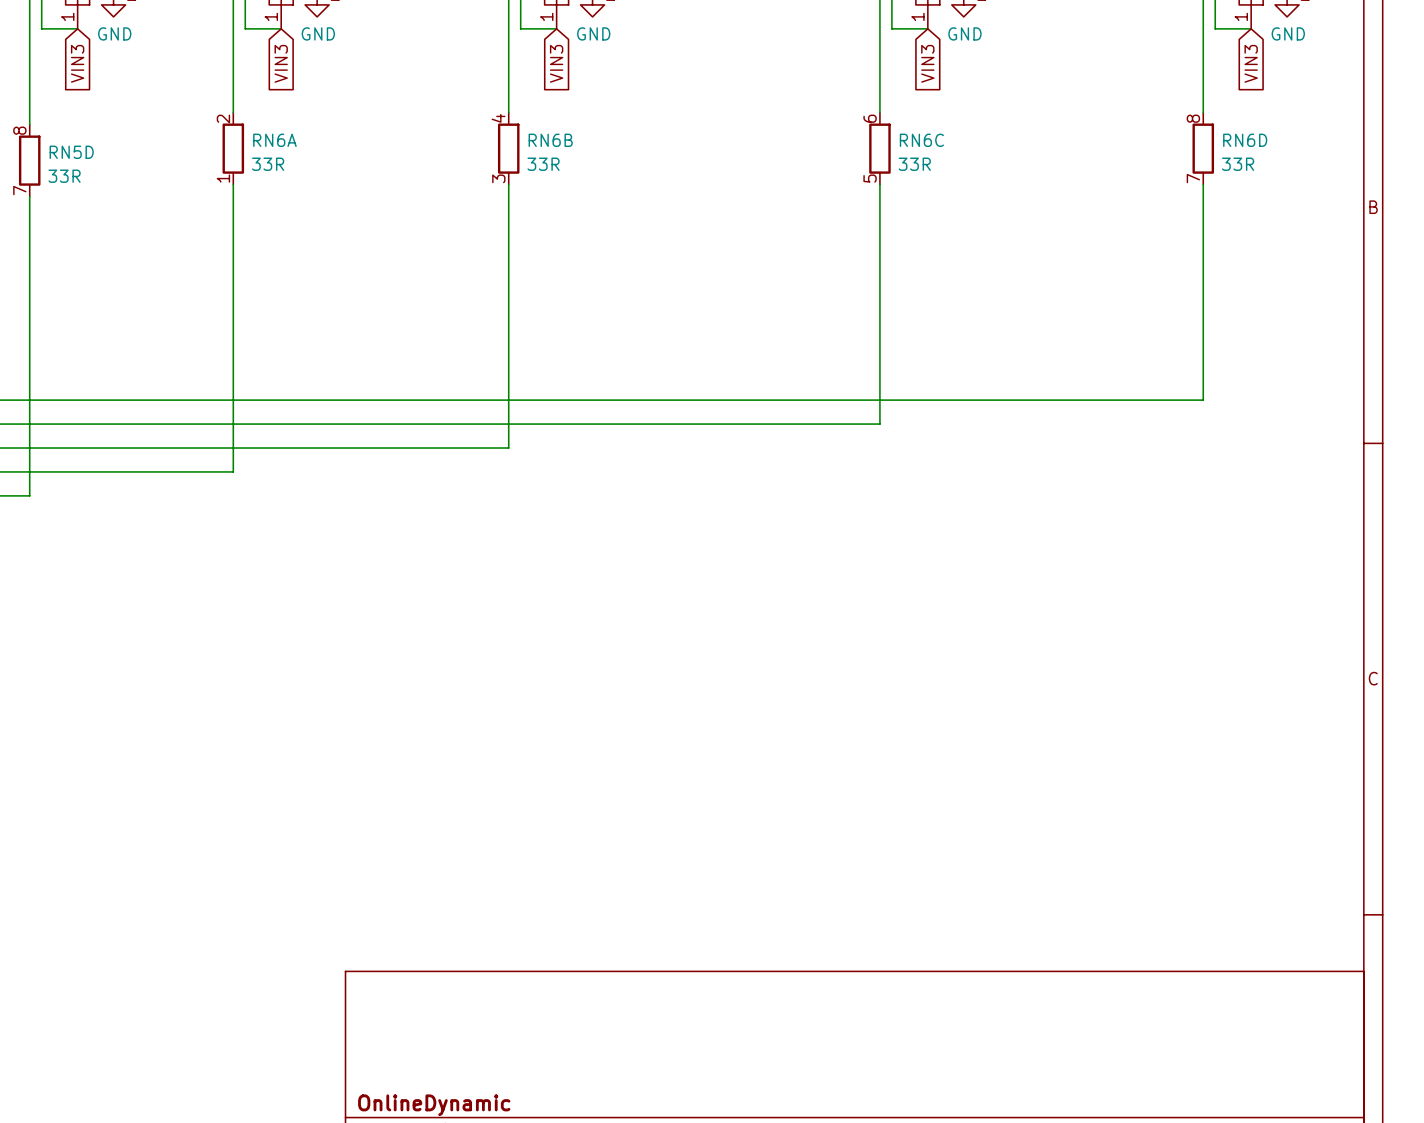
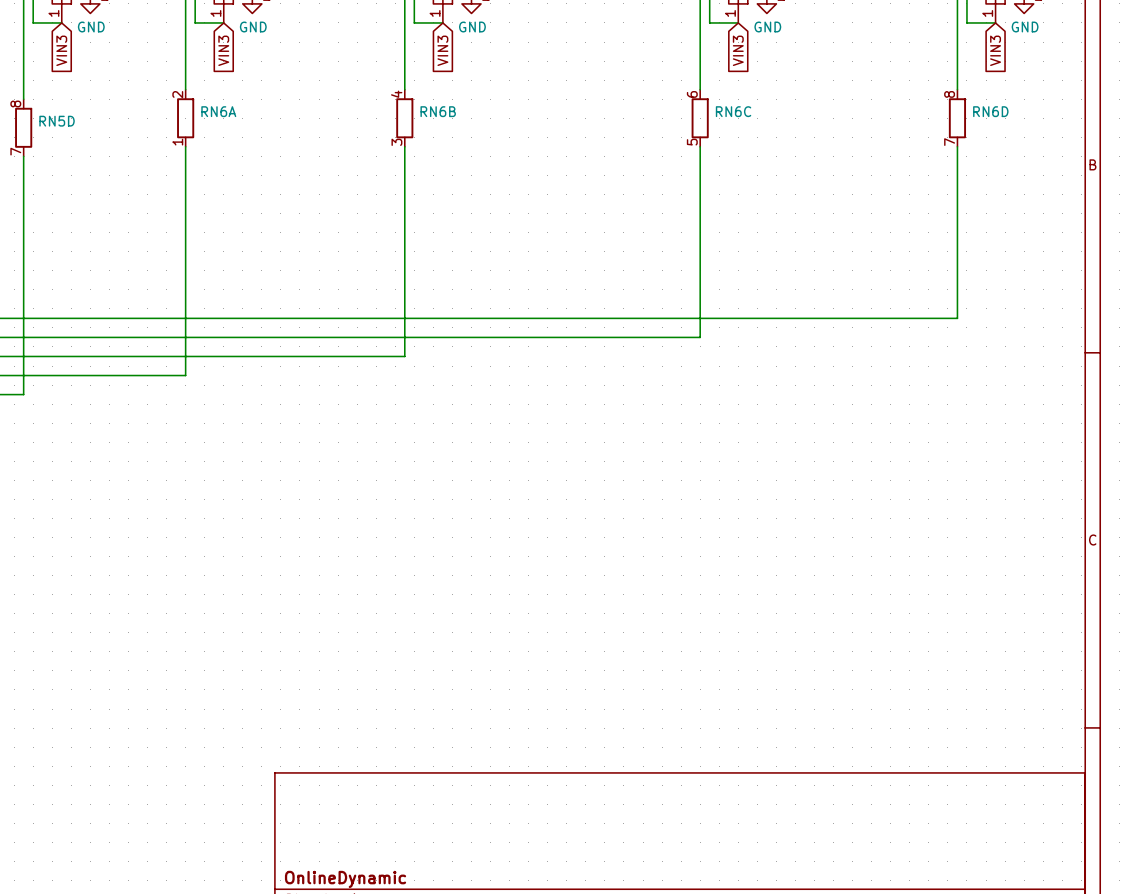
RN6A value: 33R (268, 164) -> none
RN6B value: 33R (543, 164) -> none
RN6C value: 33R (914, 164) -> none
RN6D value: 33R (1238, 164) -> none
RN5D value: 33R (64, 176) -> none

